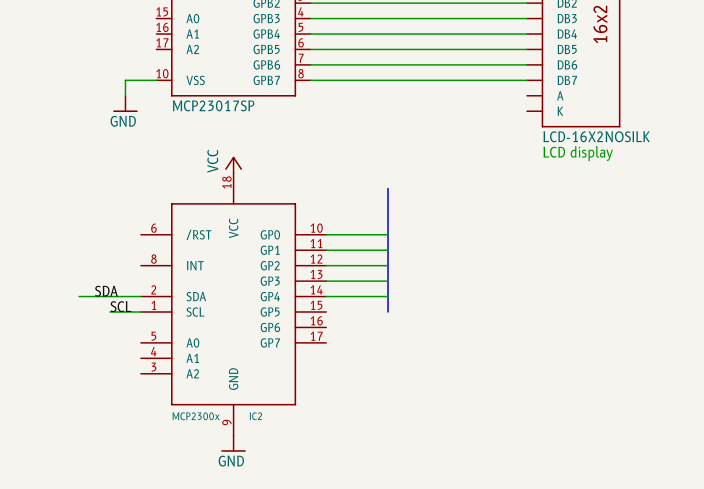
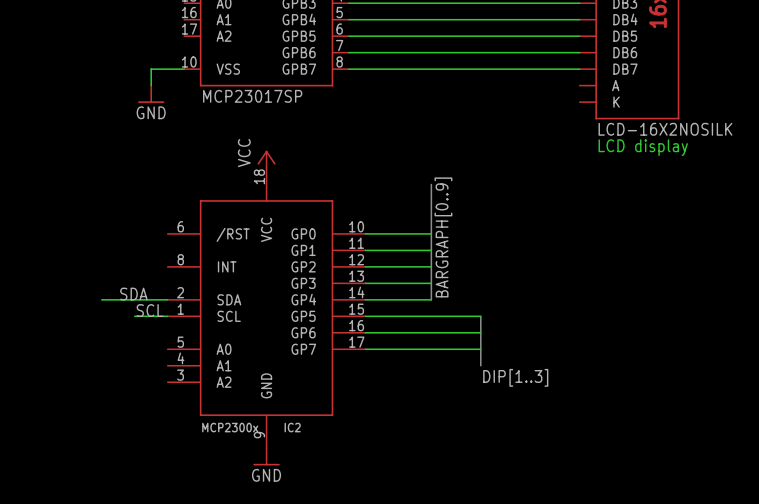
label: none -> BARGRAPH[0..9] (443, 237)
bus: (388, 296) (388, 312) -> none
wire: none -> (365, 316) (480, 316)
bus: none -> (480, 316) (480, 365)
wire: none -> (365, 332) (480, 332)
wire: none -> (365, 349) (480, 349)
label: none -> DIP[1..3] (515, 377)

